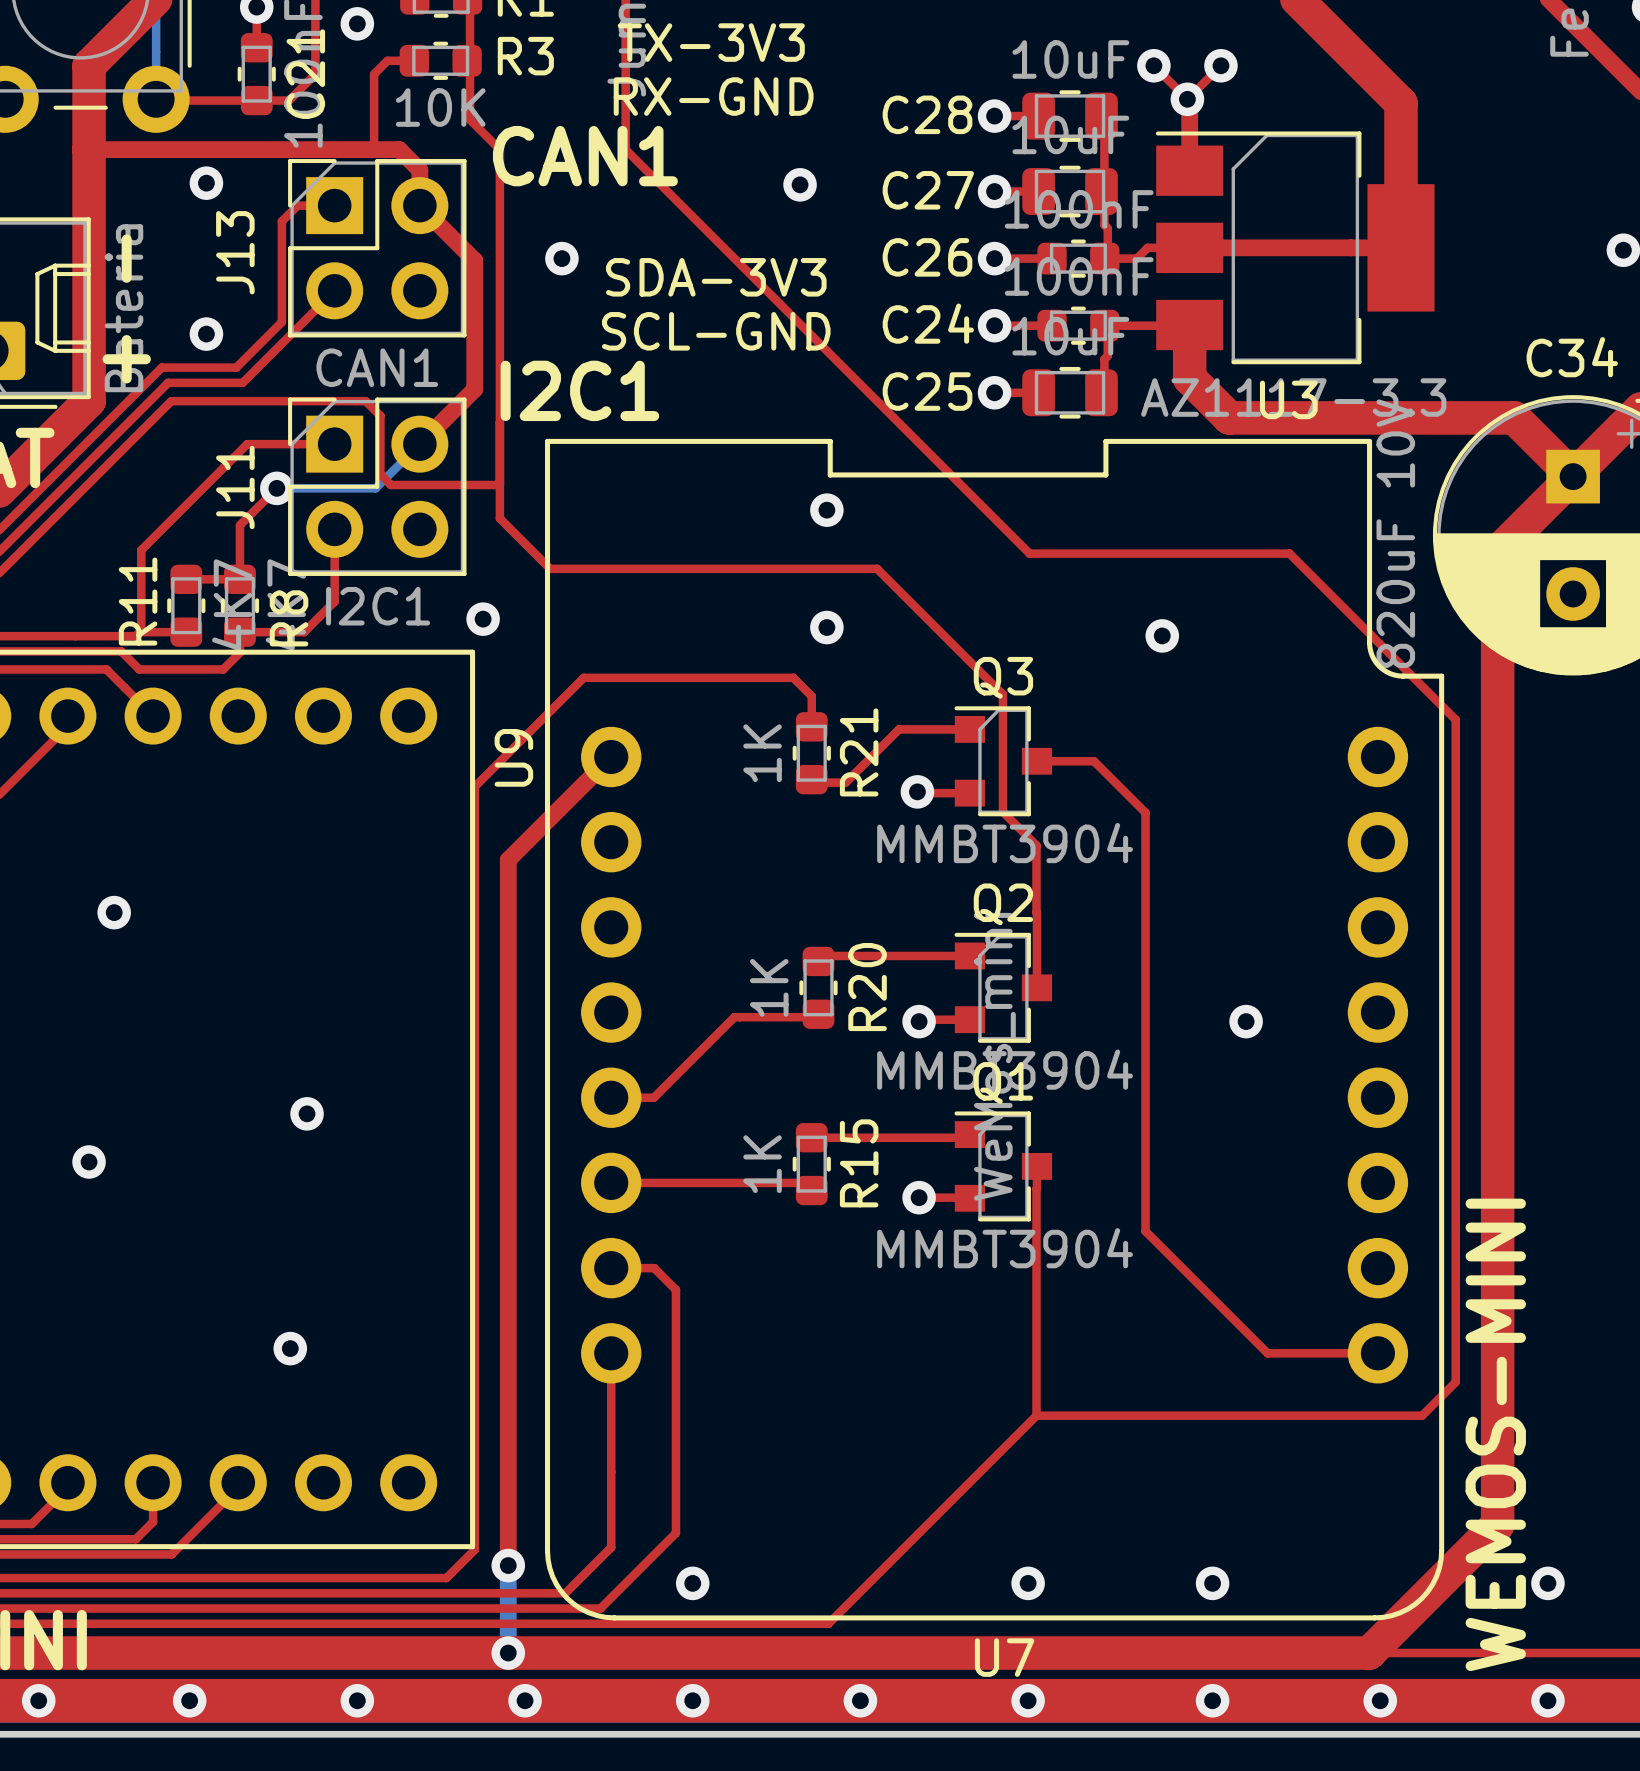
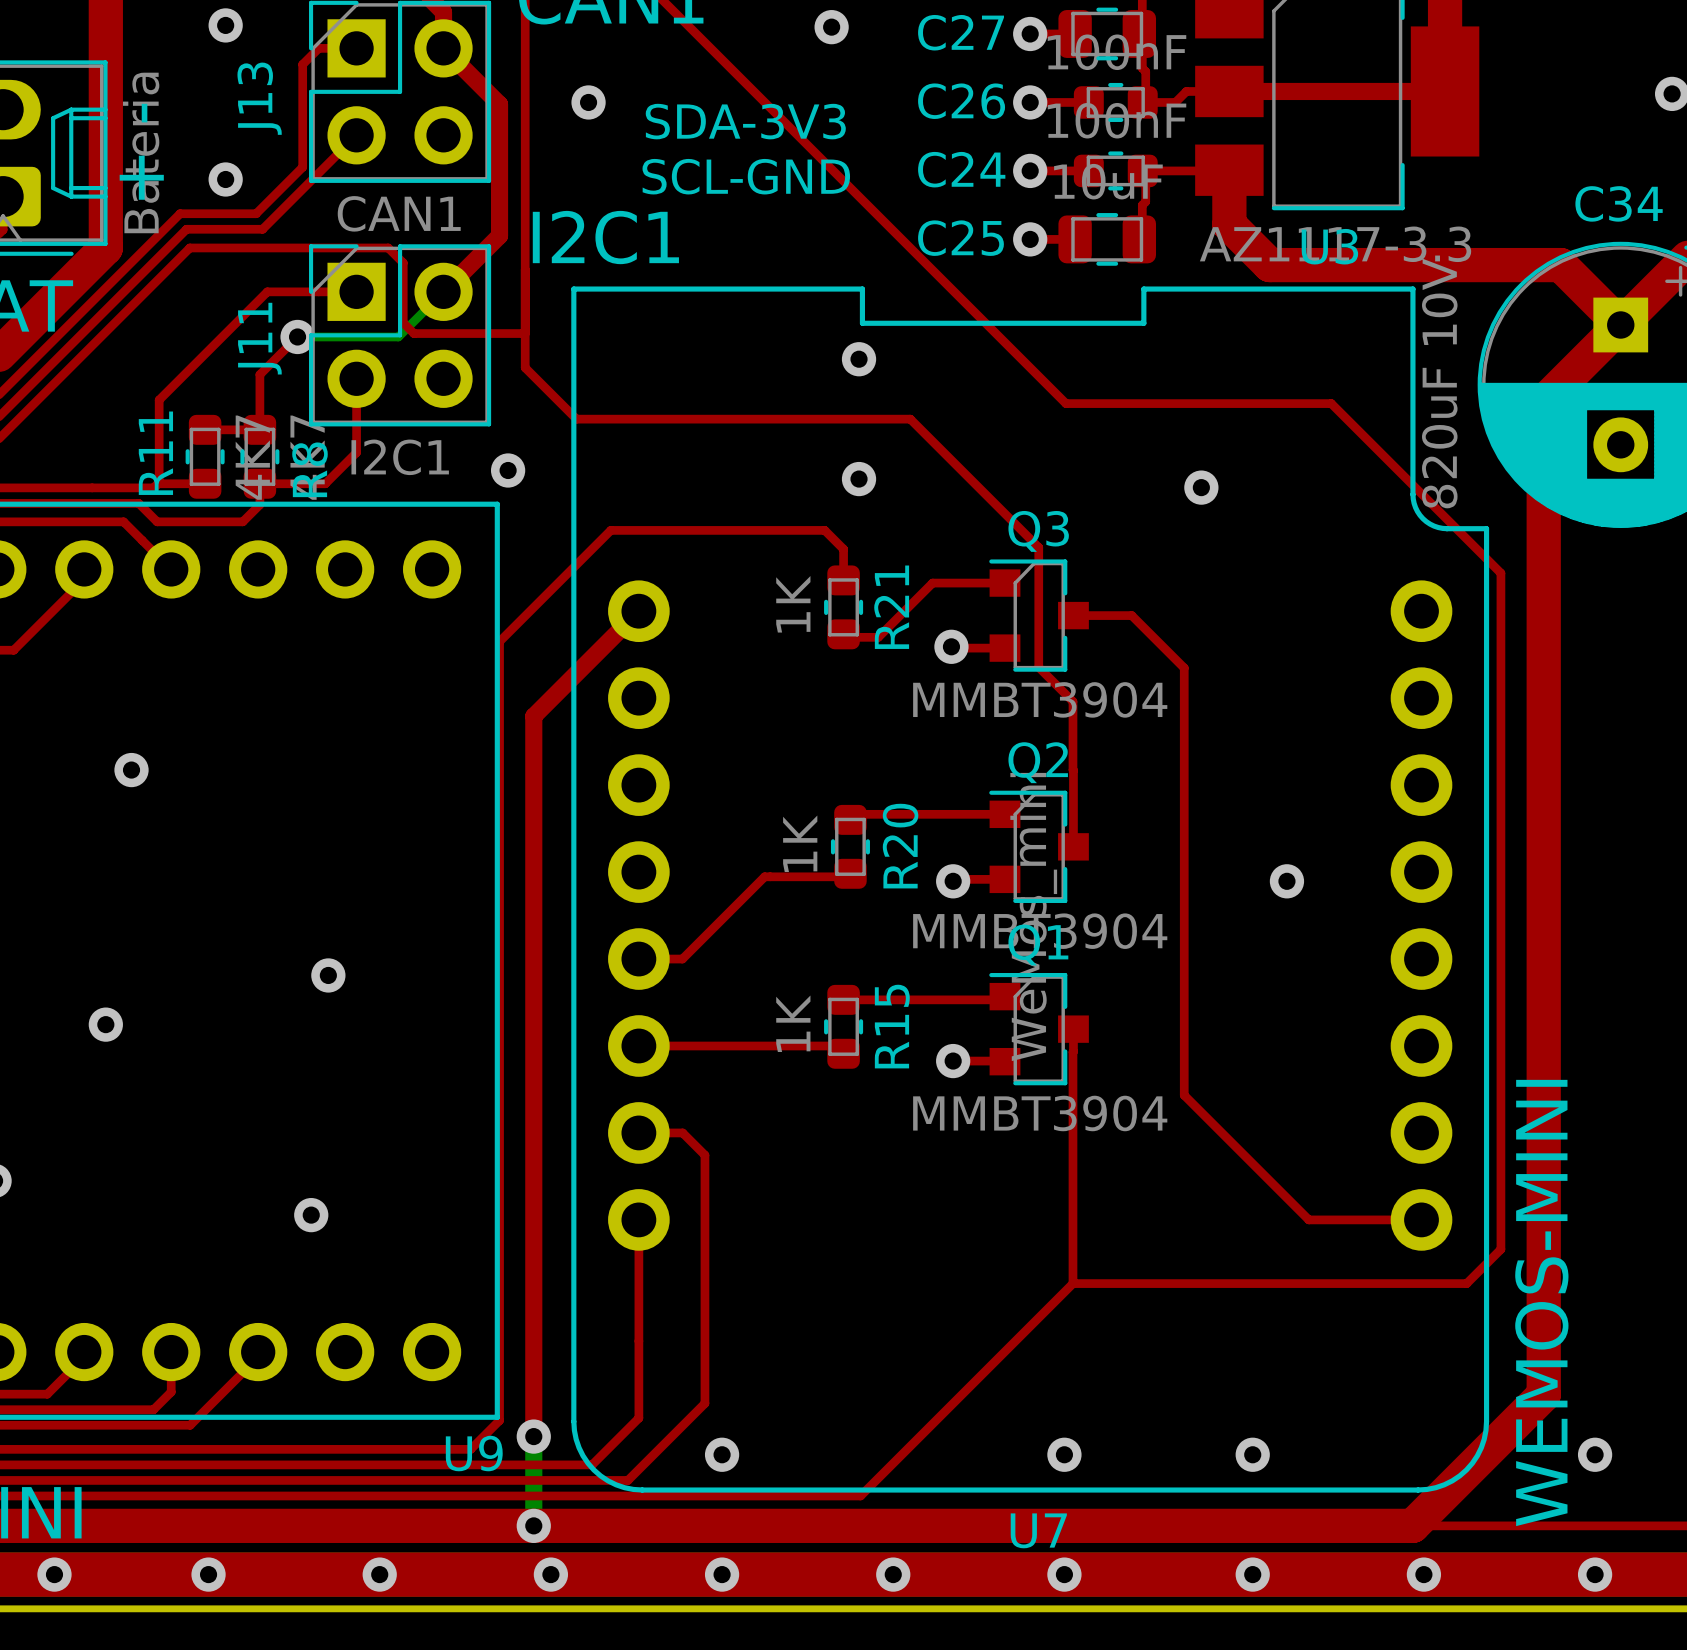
U9 name rotation: 0° (513, 757) -> 90° clockwise (474, 1453)
U9 name position: U9 (513, 757) -> U9 (474, 1453)

